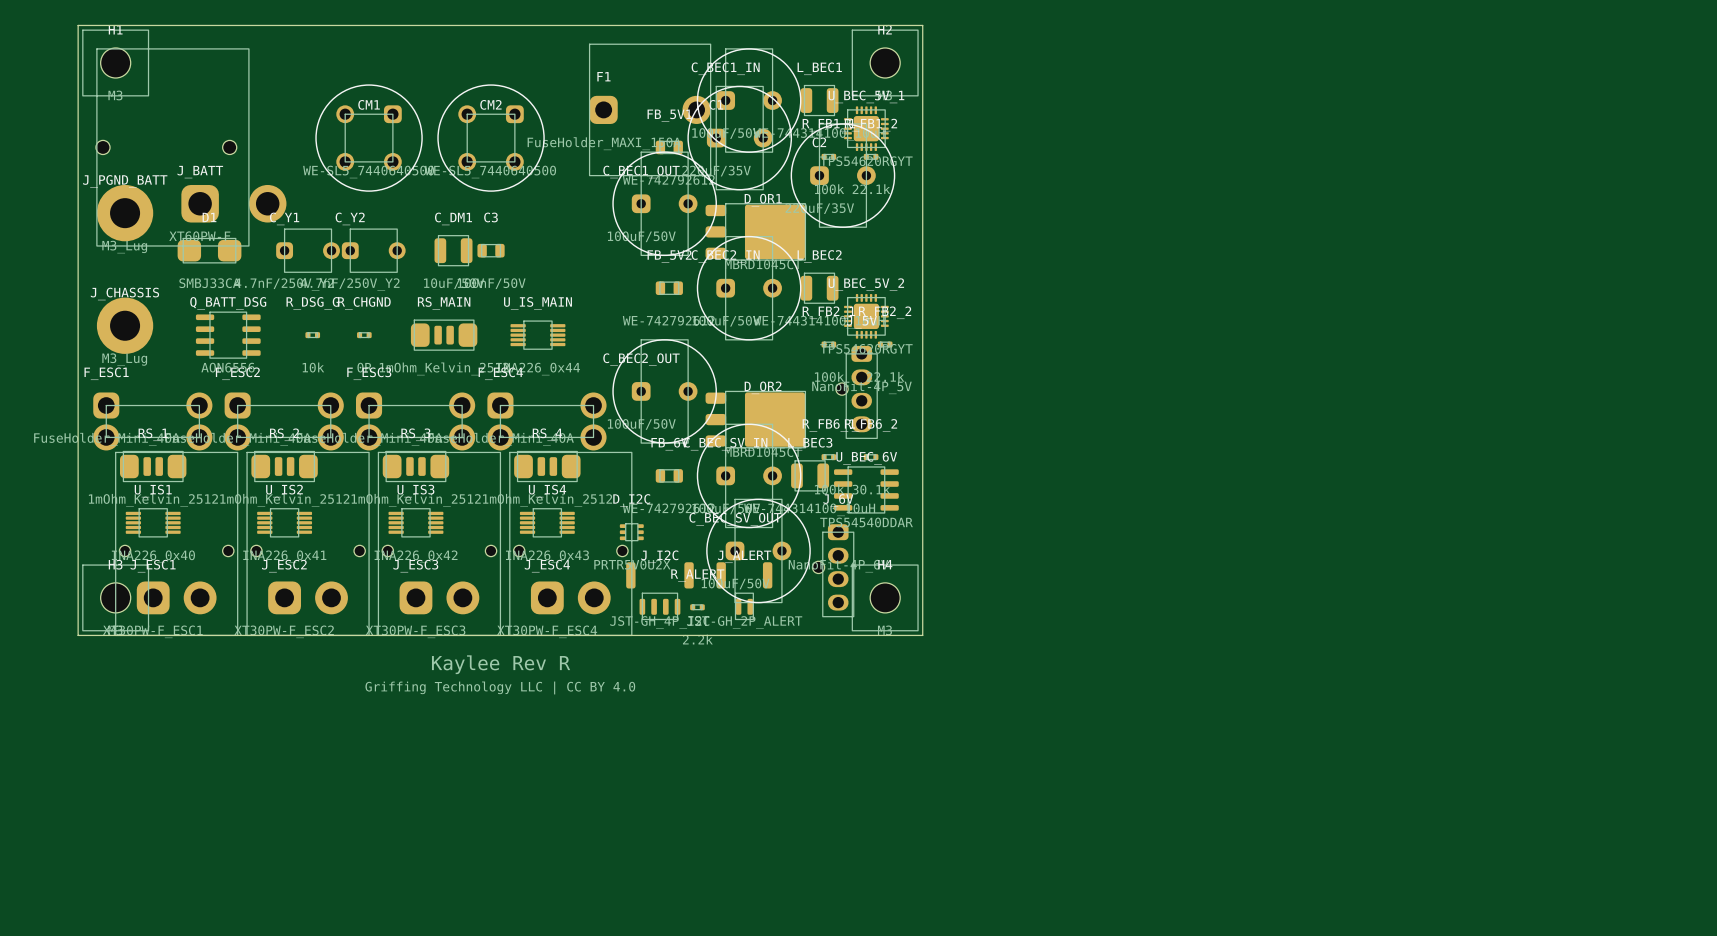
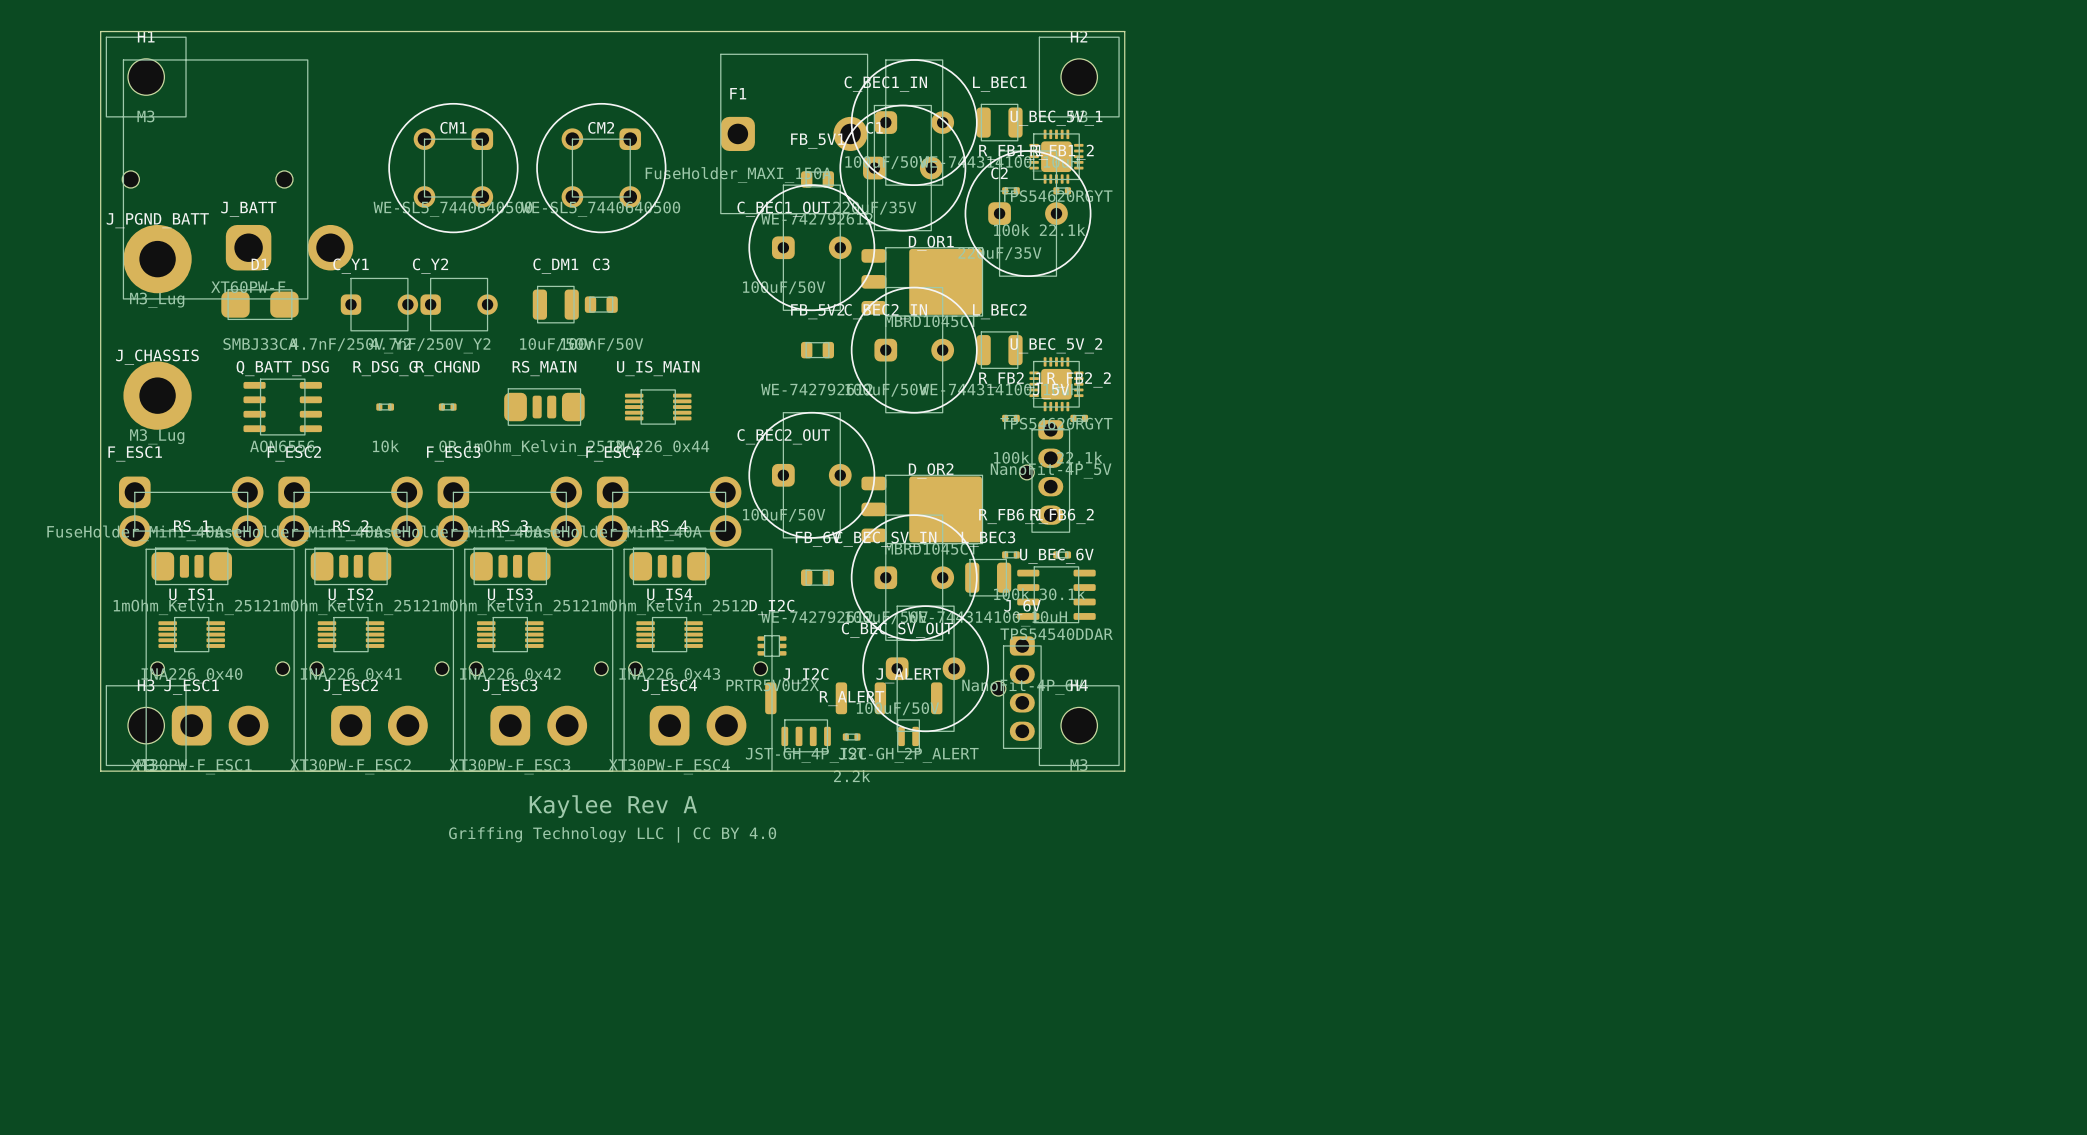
text: Kaylee Rev R (501, 664) -> Kaylee Rev A (613, 806)

